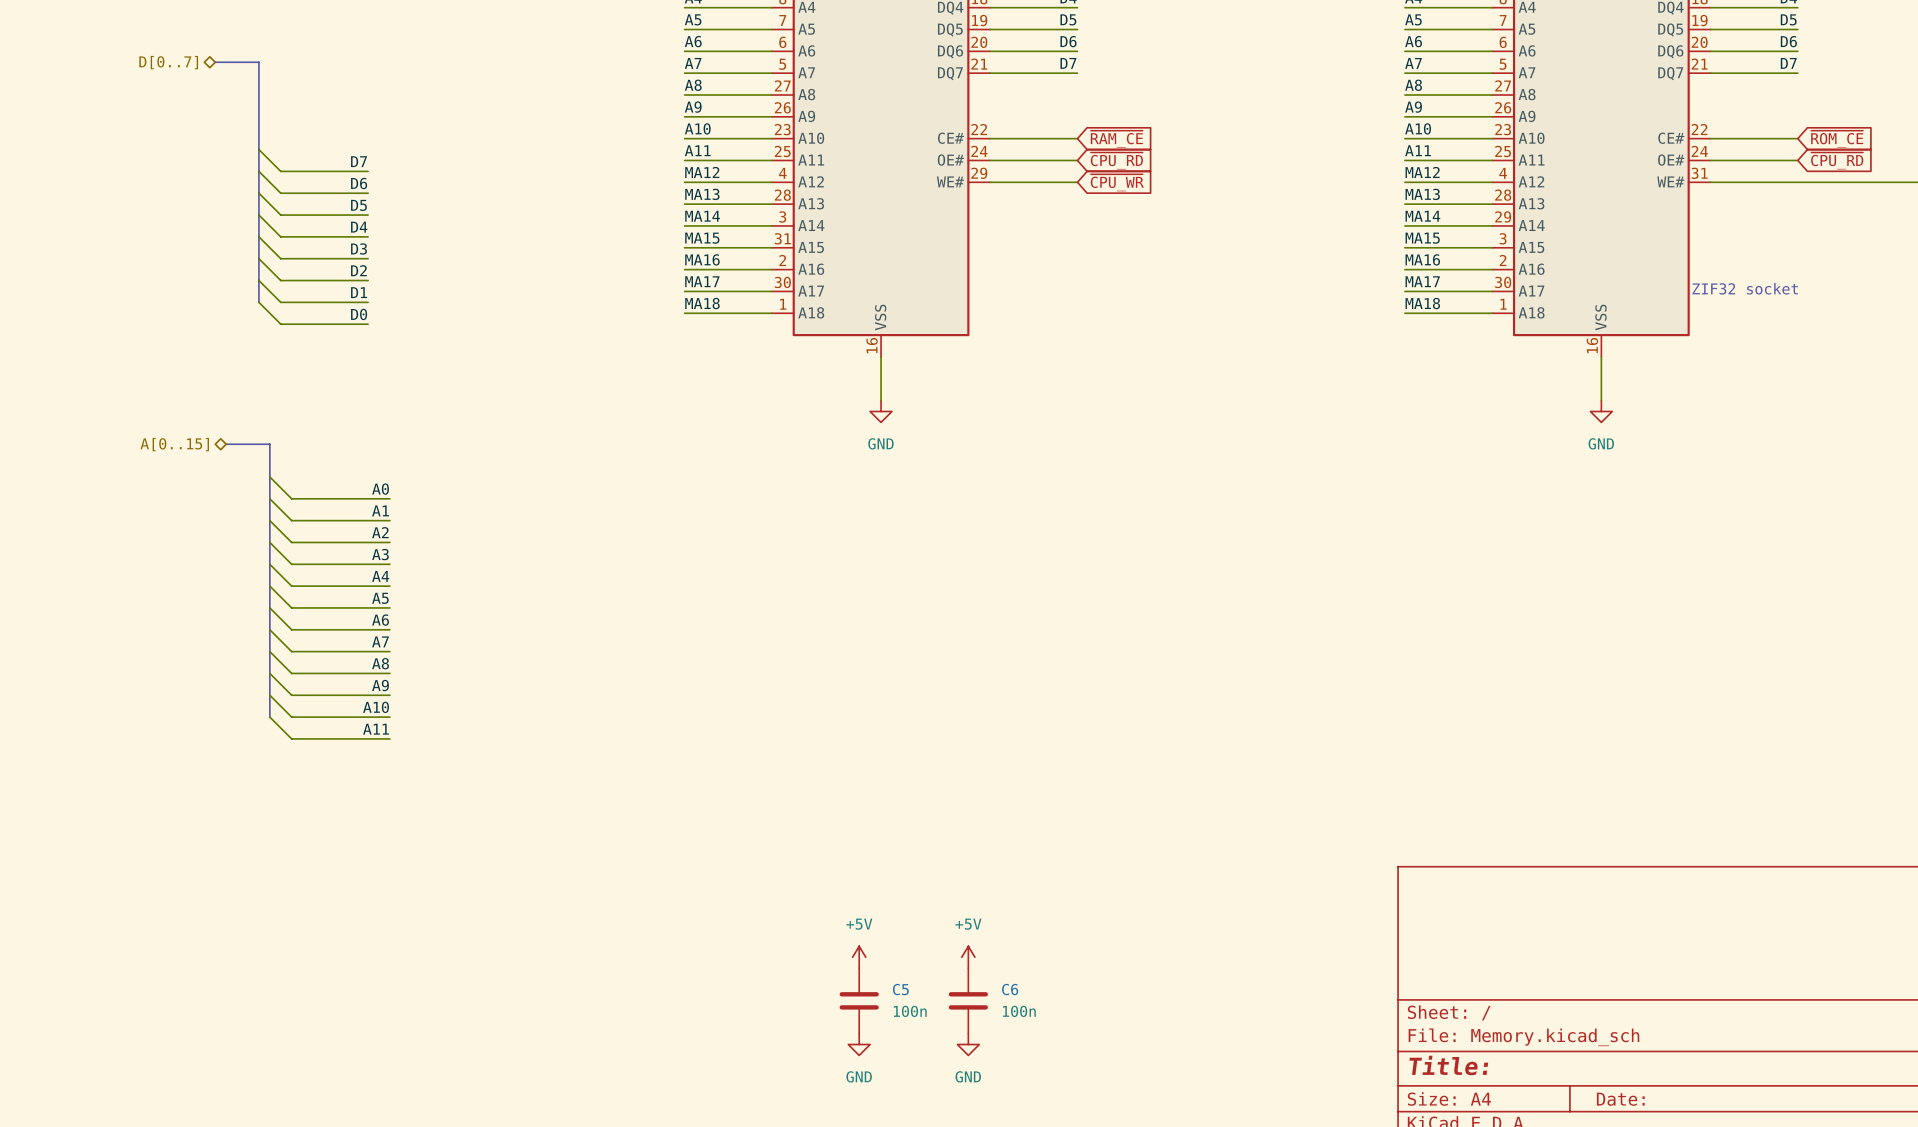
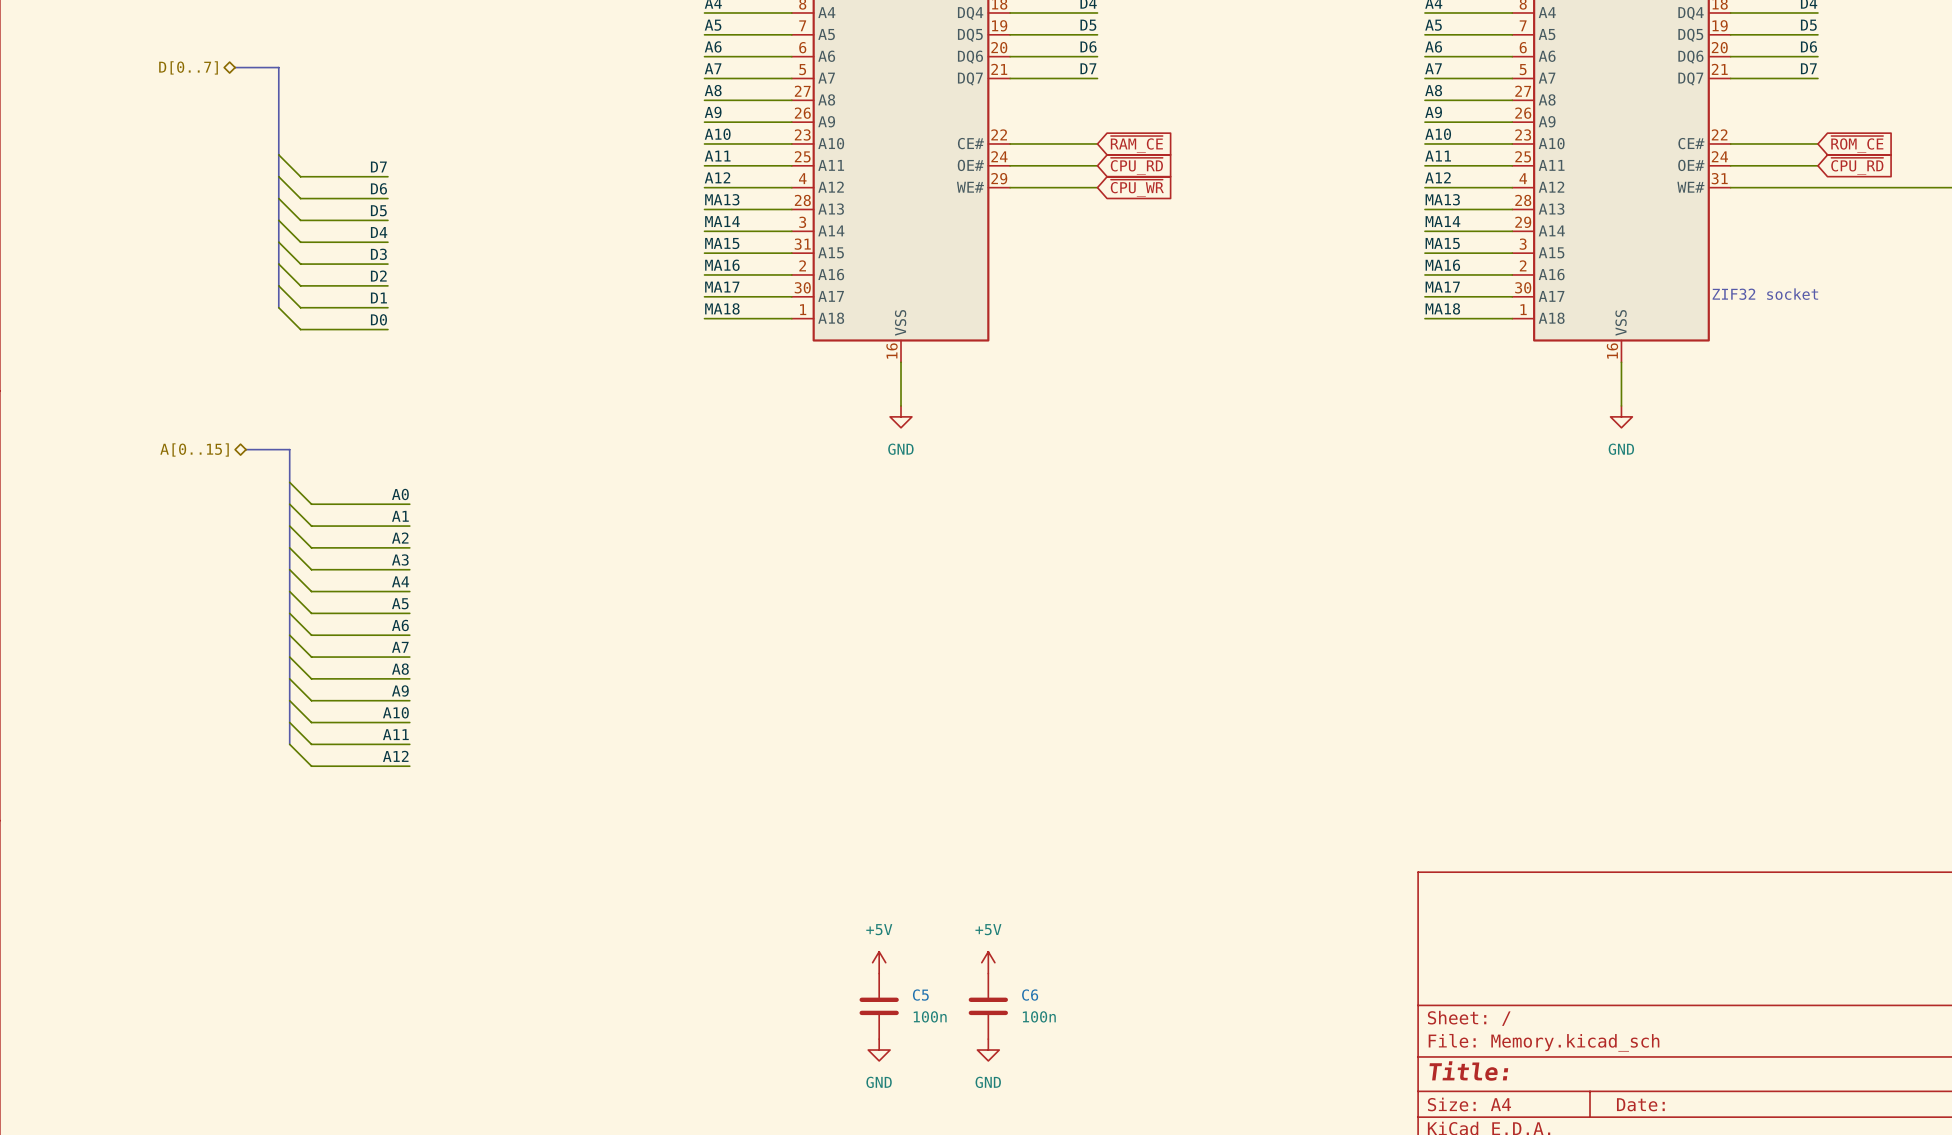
label: MA12 (702, 172) -> A12 (717, 177)
label: MA12 (1422, 172) -> A12 (1437, 177)
bus: none -> (289, 722) (289, 744)
wire: none -> (289, 744) (311, 766) (409, 766)
label: none -> A12 (395, 756)

